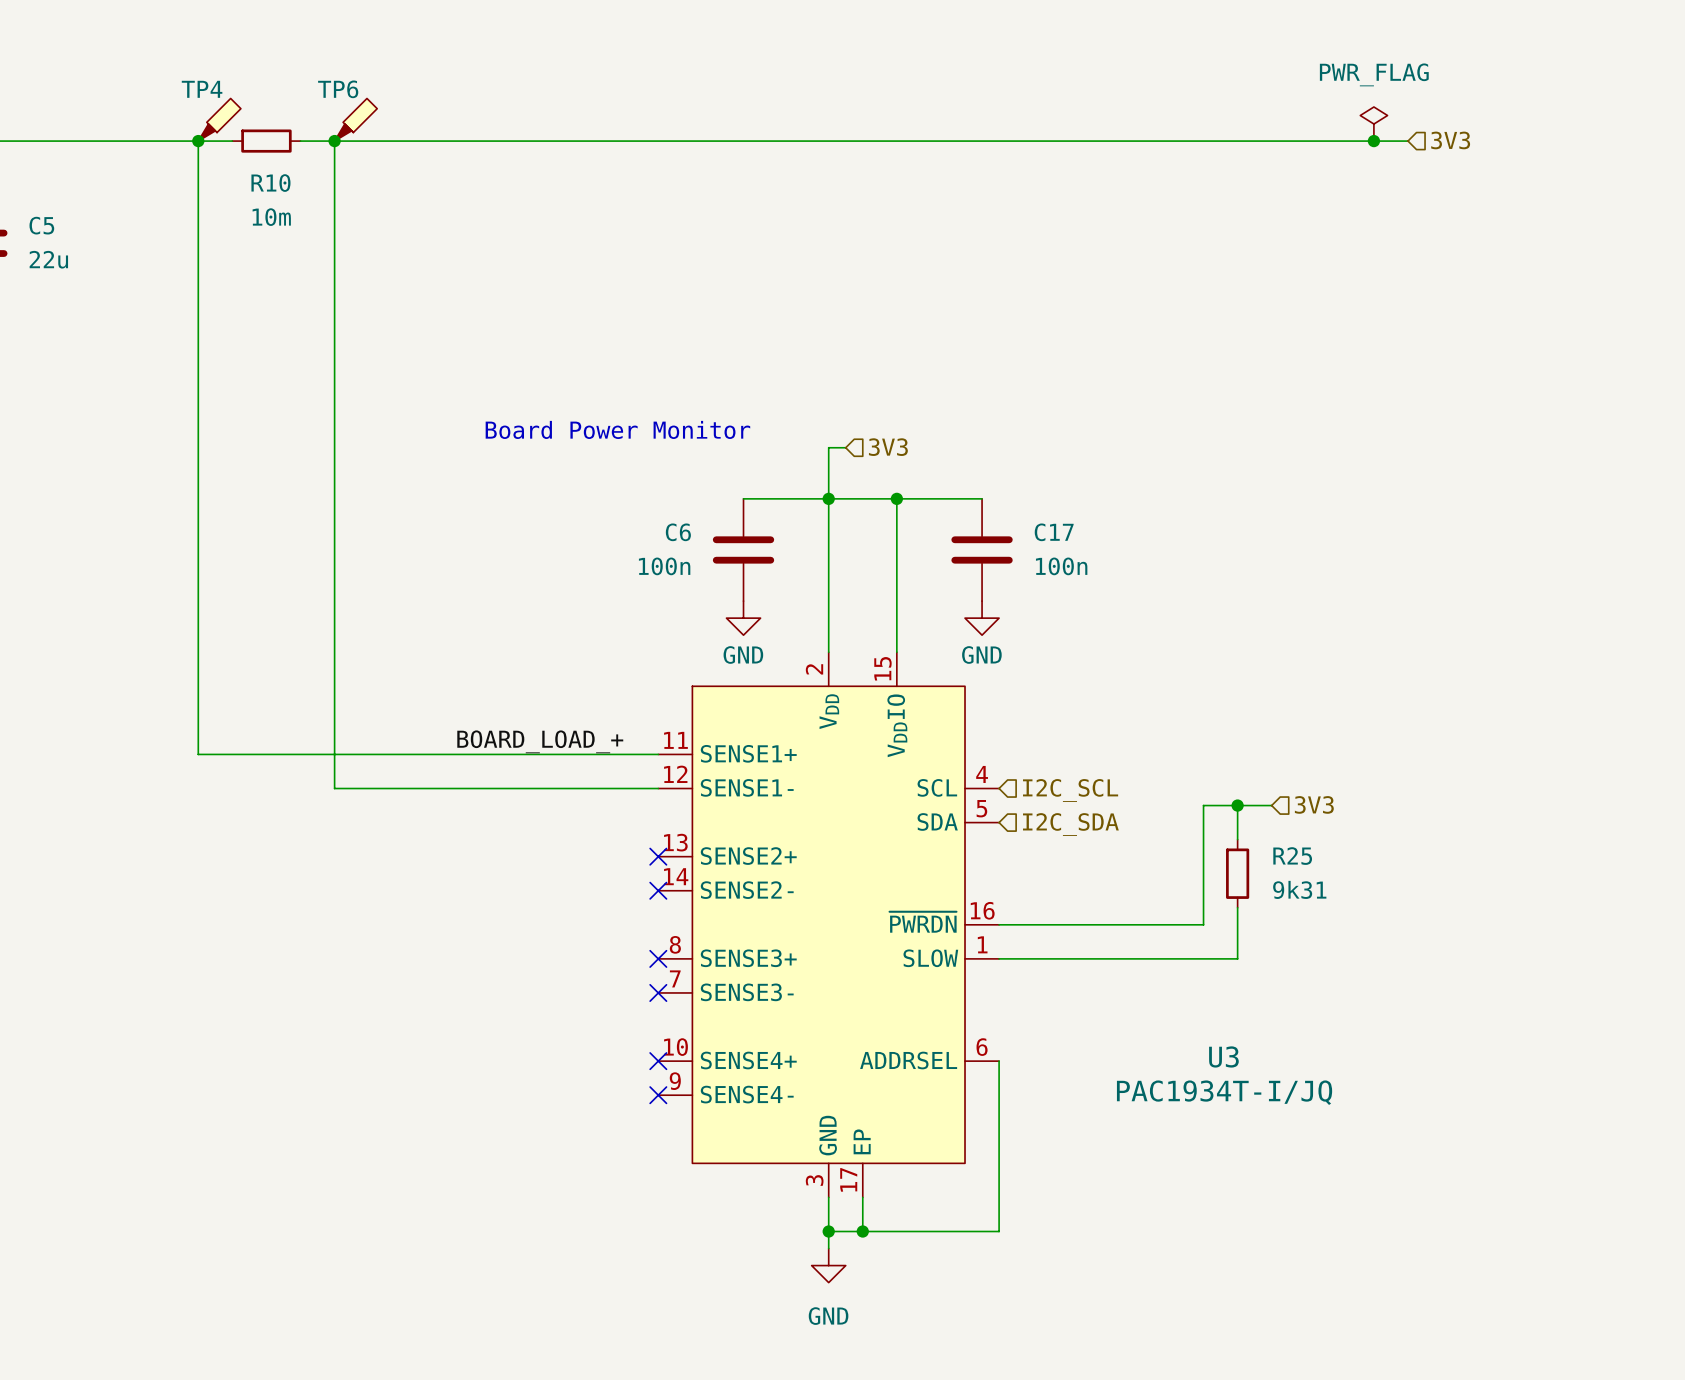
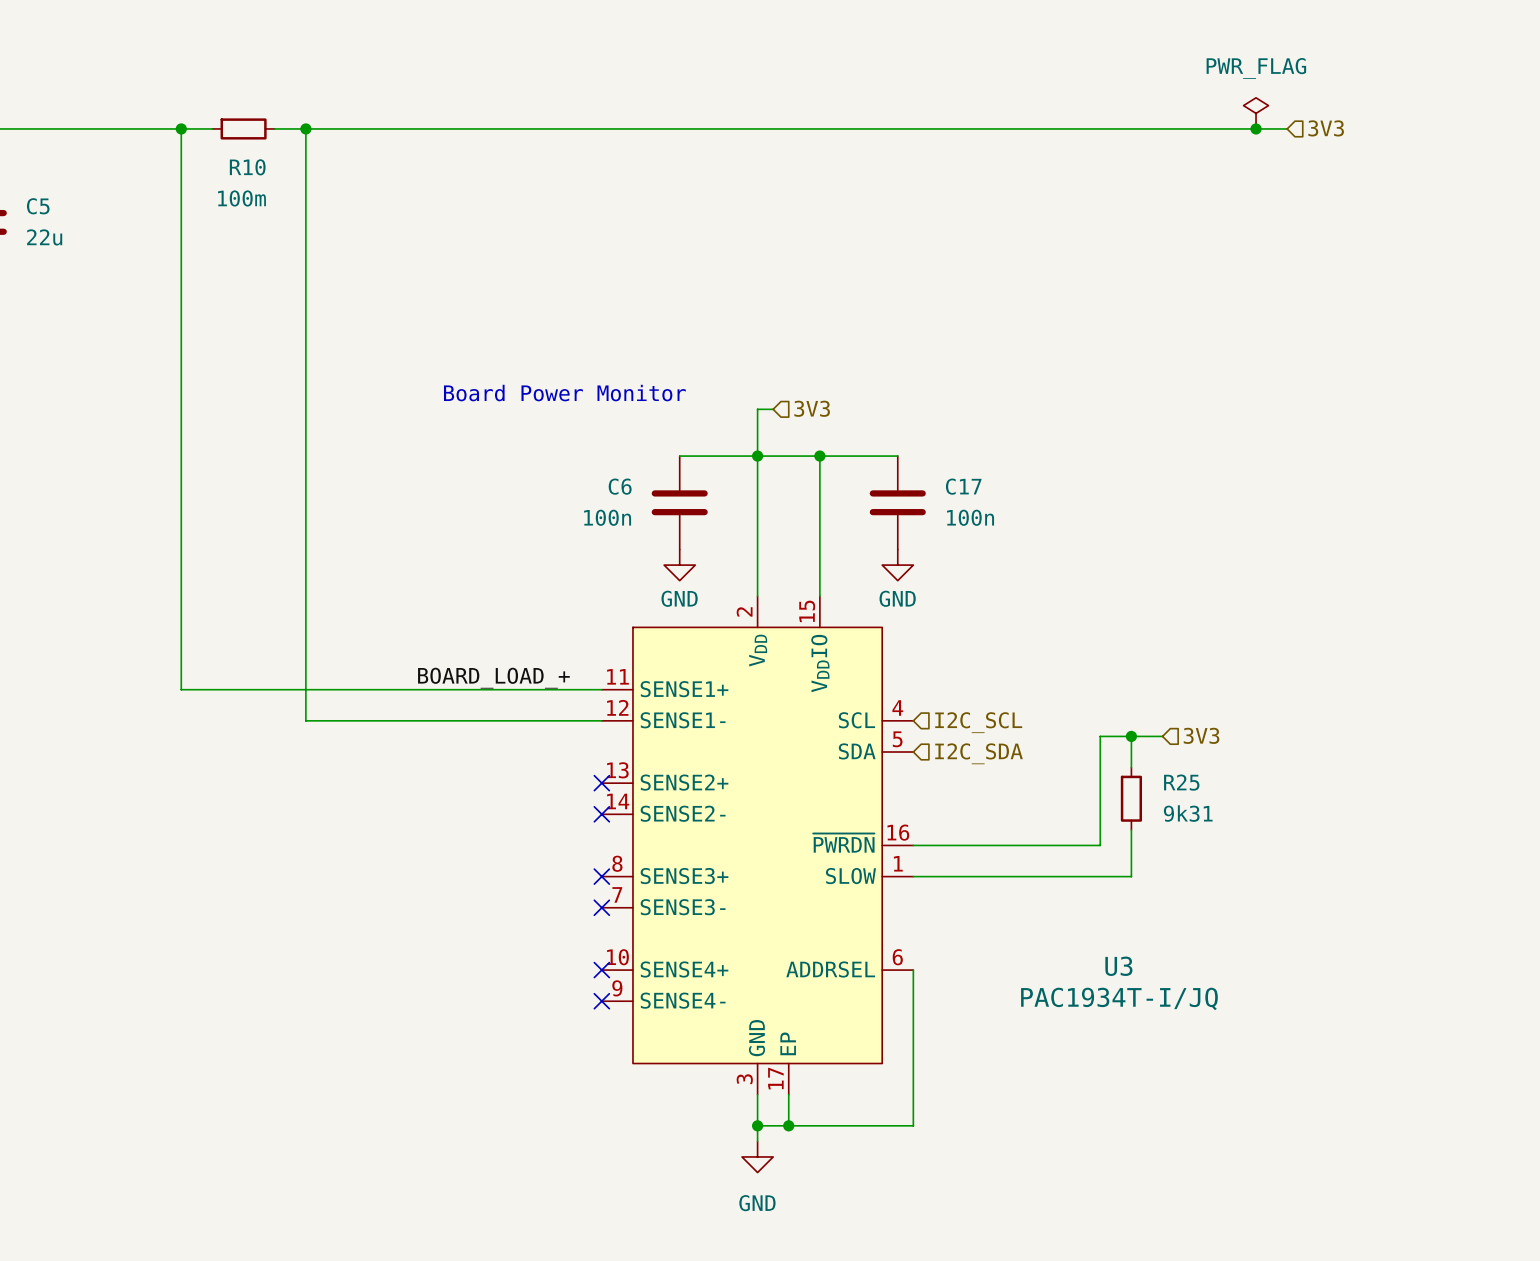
TP4: (219, 119) -> none
TP6: (355, 119) -> none
R10 value: 10m (271, 217) -> 100m (241, 198)

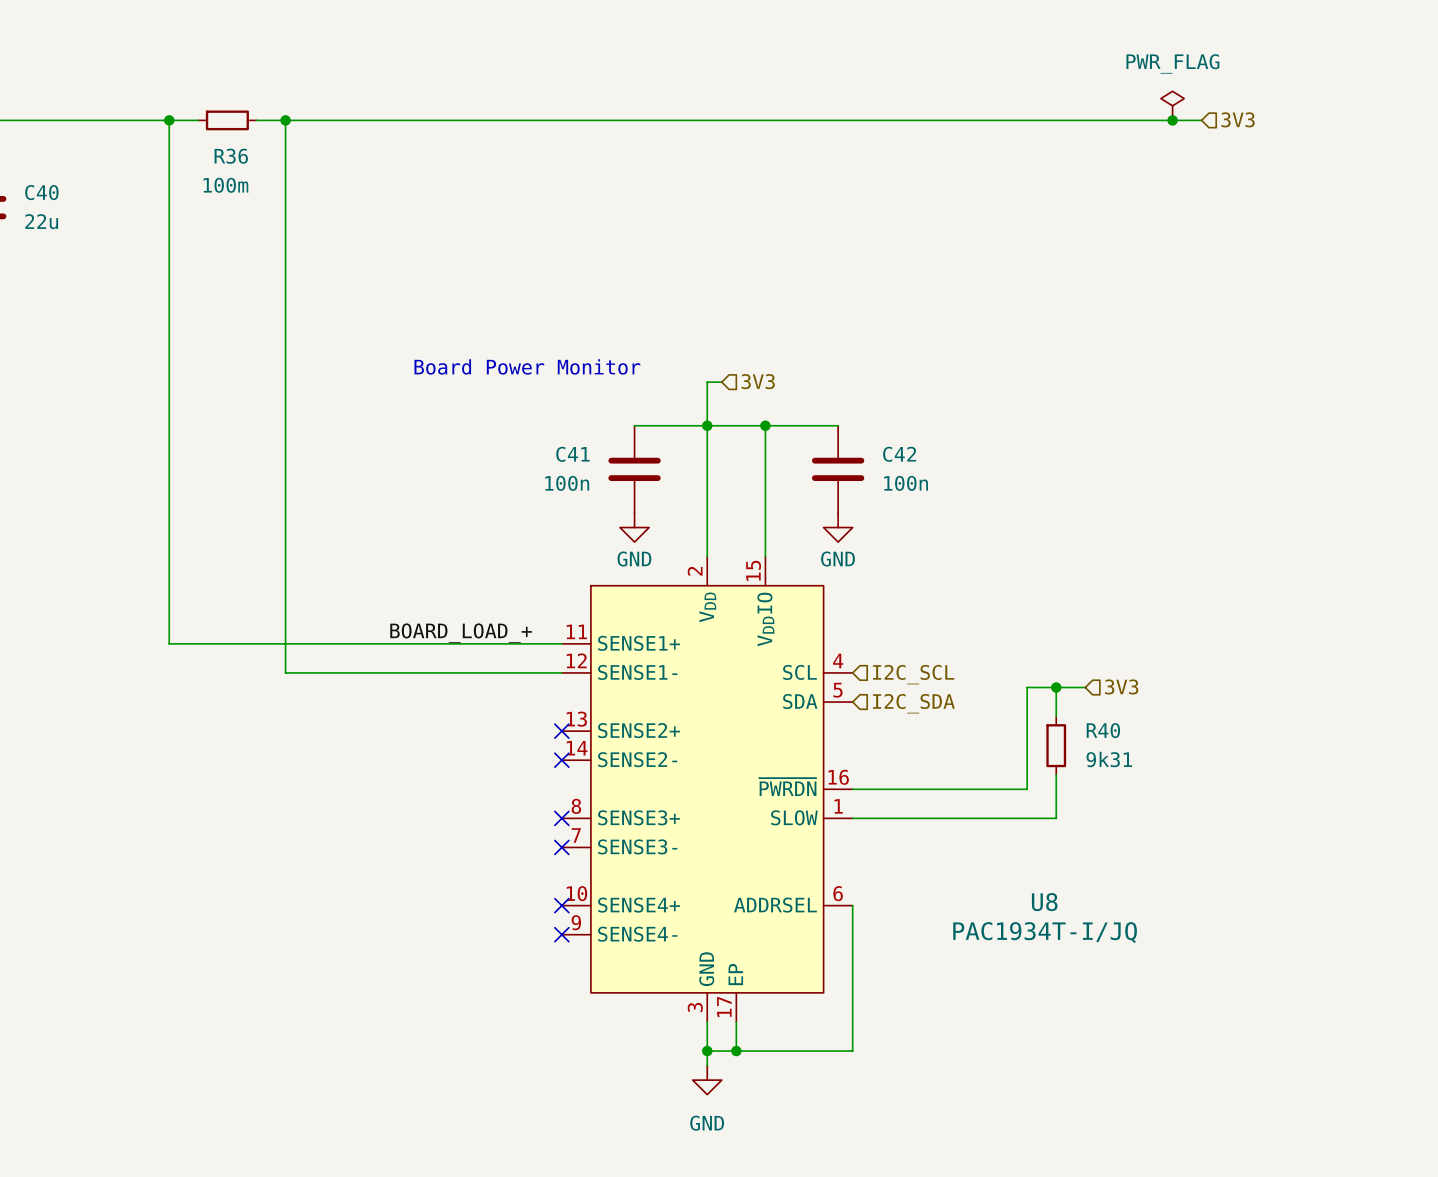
R10 name: R10 (247, 167) -> R36 (231, 156)
C5 name: C5 (38, 206) -> C40 (41, 192)
C6 name: C6 (620, 486) -> C41 (572, 454)
C17 name: C17 (963, 486) -> C42 (899, 454)
R25 name: R25 (1181, 782) -> R40 (1103, 730)
U3 name: U3 (1118, 966) -> U8 (1044, 902)

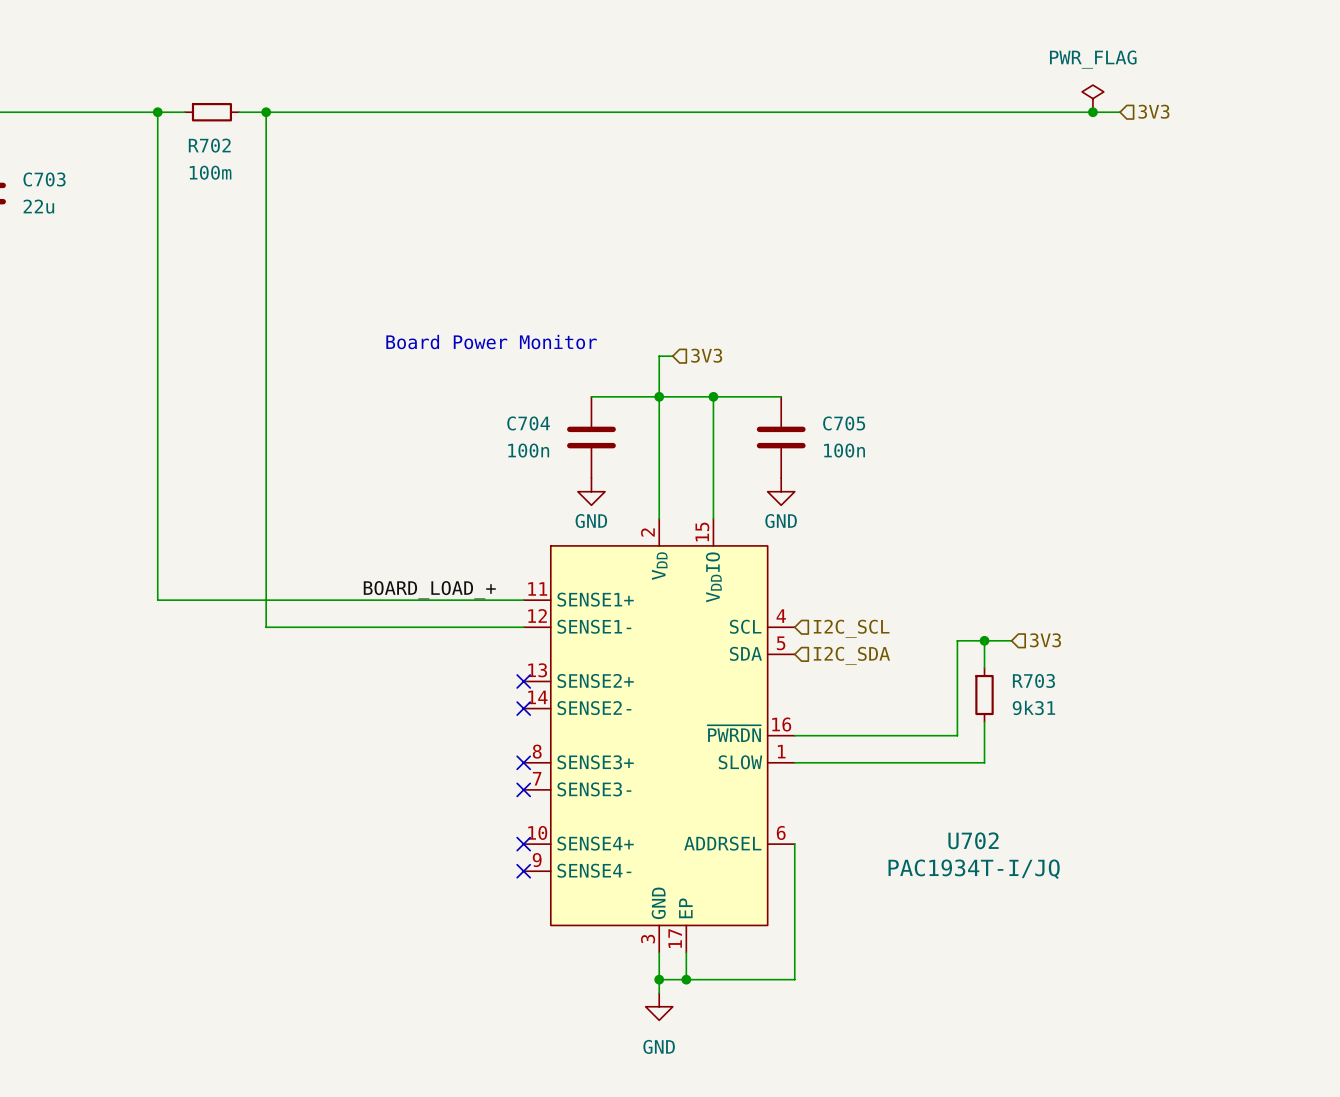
R36 name: R36 (231, 156) -> R702 (209, 145)
C40 name: C40 (41, 192) -> C703 (44, 179)
C41 name: C41 (572, 454) -> C704 (528, 423)
C42 name: C42 (899, 454) -> C705 (844, 423)
R40 name: R40 (1103, 730) -> R703 (1033, 680)
U8 name: U8 (1044, 902) -> U702 (973, 840)

